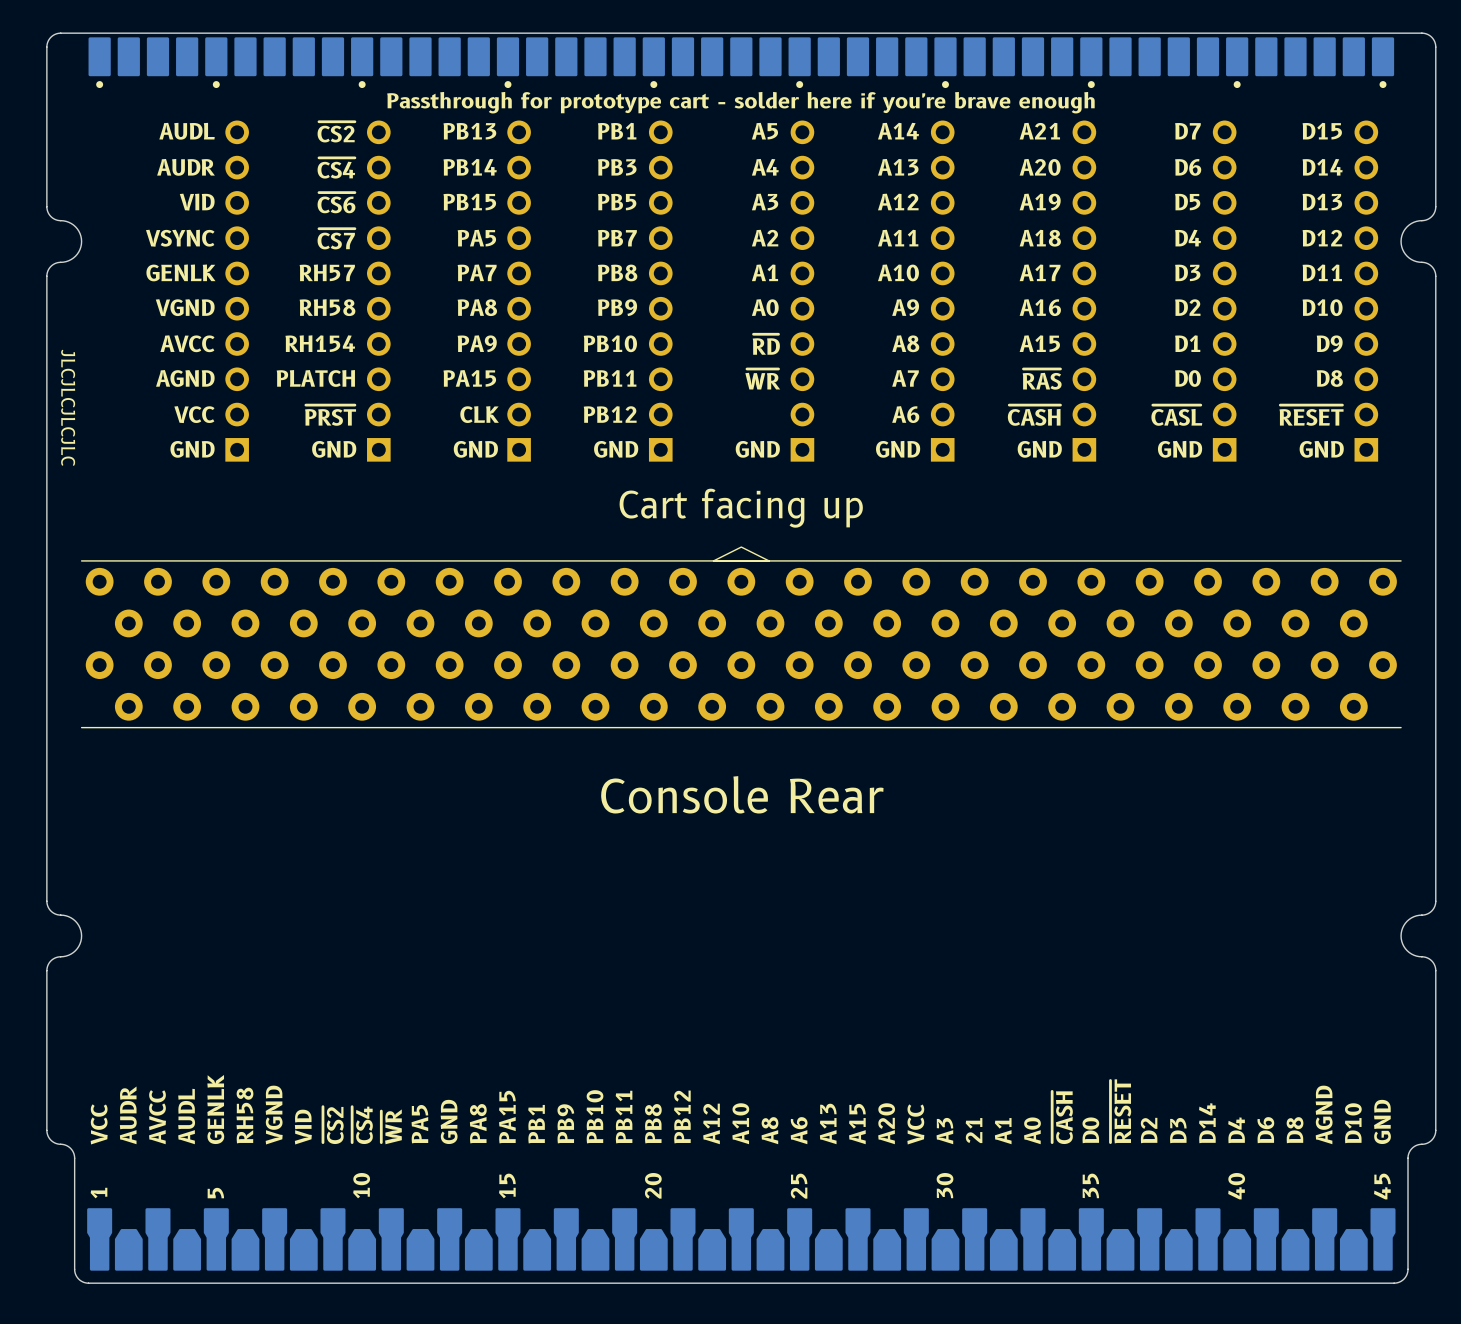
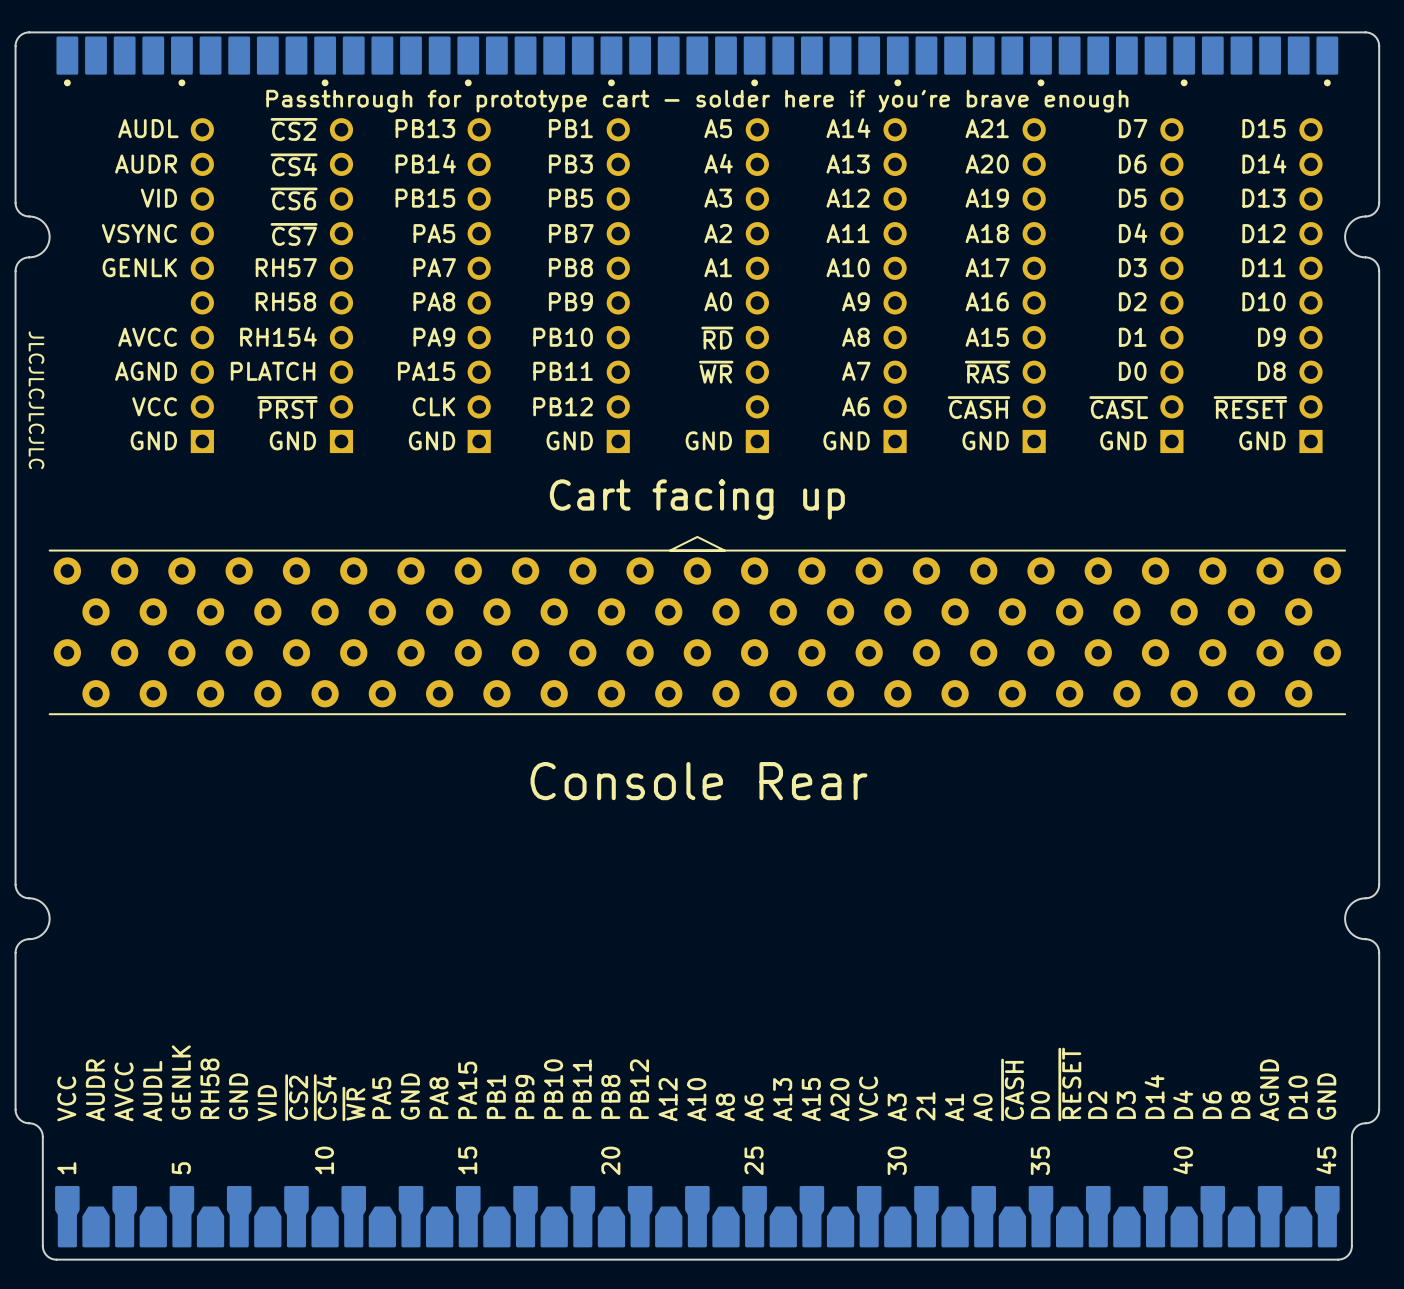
text: VGND (185, 307) -> none
text: VGND (274, 1115) -> GND (238, 1096)

